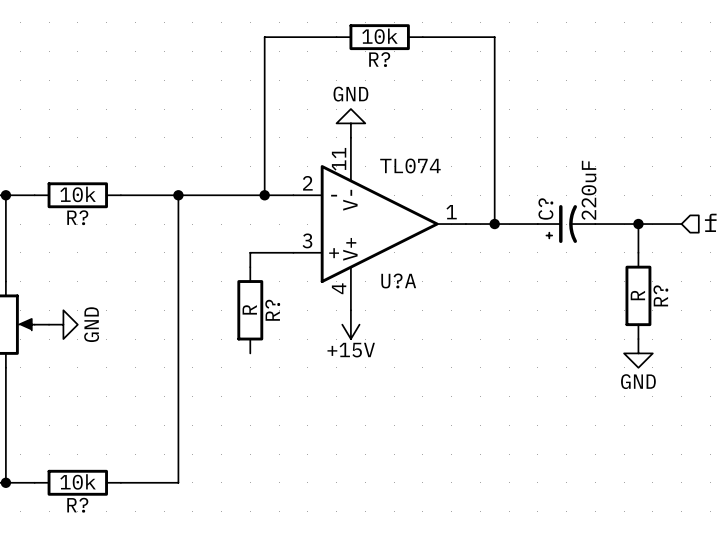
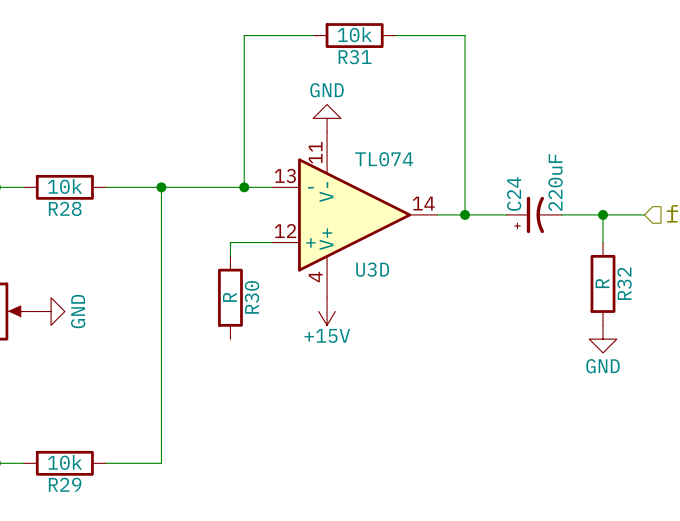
R? name: R? (379, 59) -> R31 (355, 57)
U?A pin number: 2 (307, 183) -> 13 (285, 175)
C? name: C? (545, 208) -> C24 (514, 194)
U?A pin number: 1 (451, 212) -> 14 (423, 203)
R? name: R? (77, 217) -> R28 (65, 208)
U?A pin number: 3 (307, 240) -> 12 (285, 231)
U?A name: U?A (398, 280) -> U3D (372, 269)
R? name: R? (660, 295) -> R32 (624, 283)
R? name: R? (272, 310) -> R30 (252, 297)
R? name: R? (77, 505) -> R29 (65, 484)

